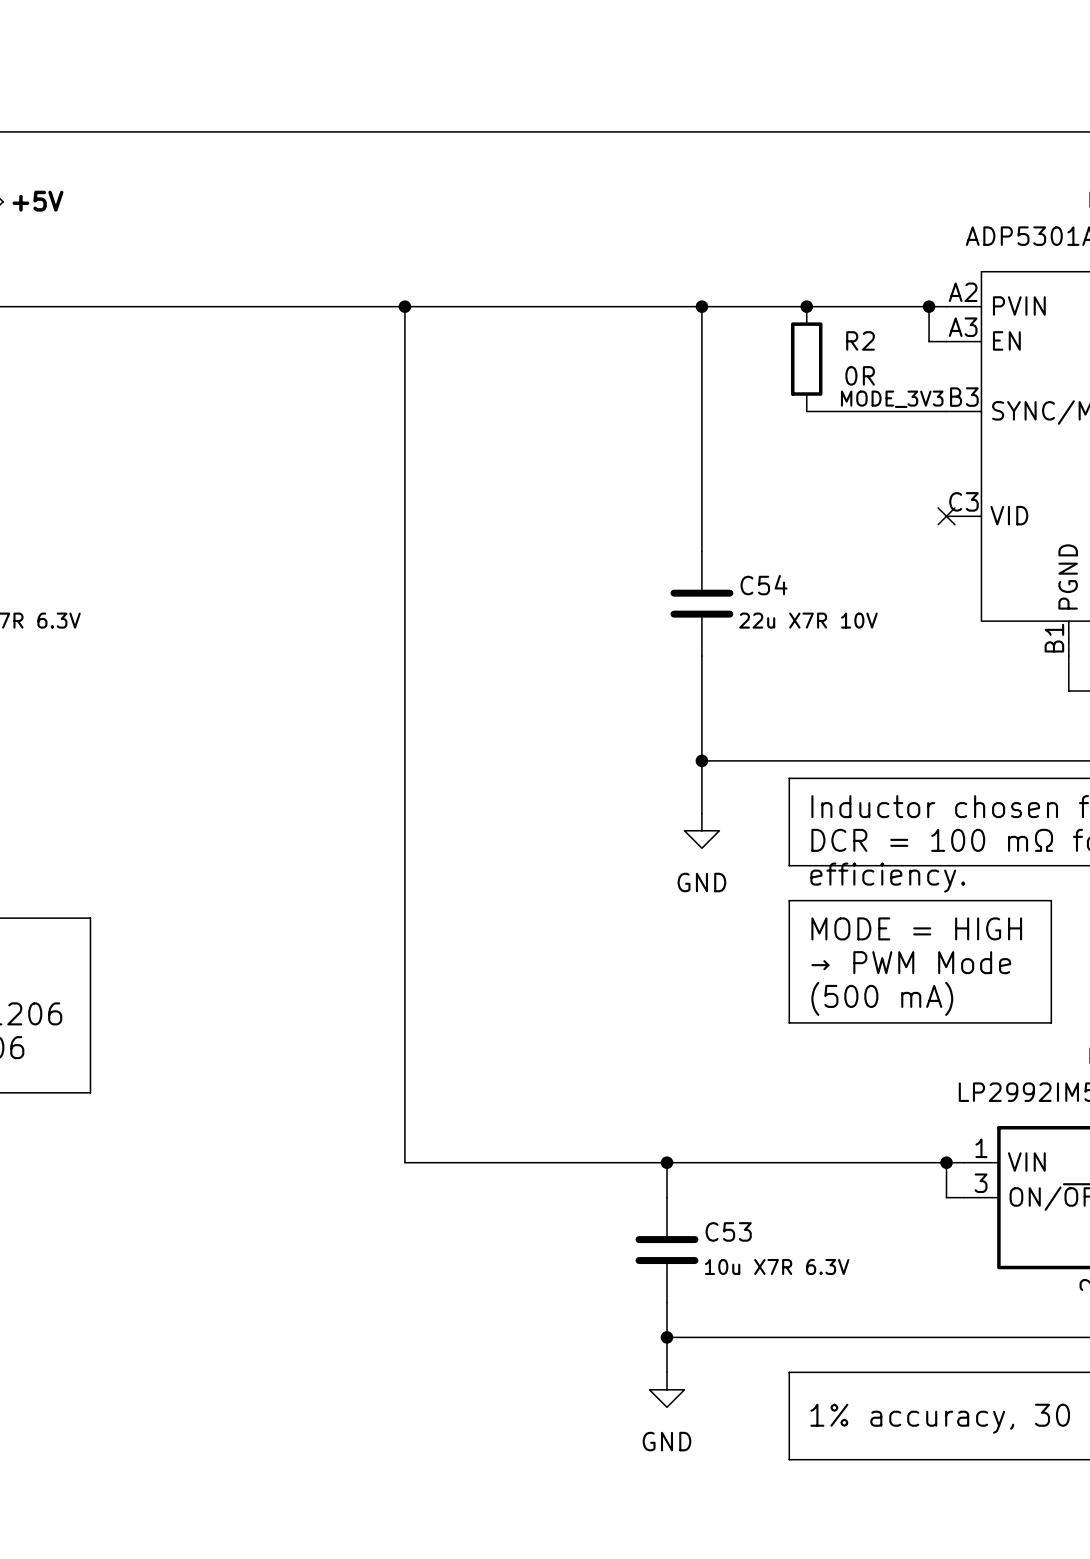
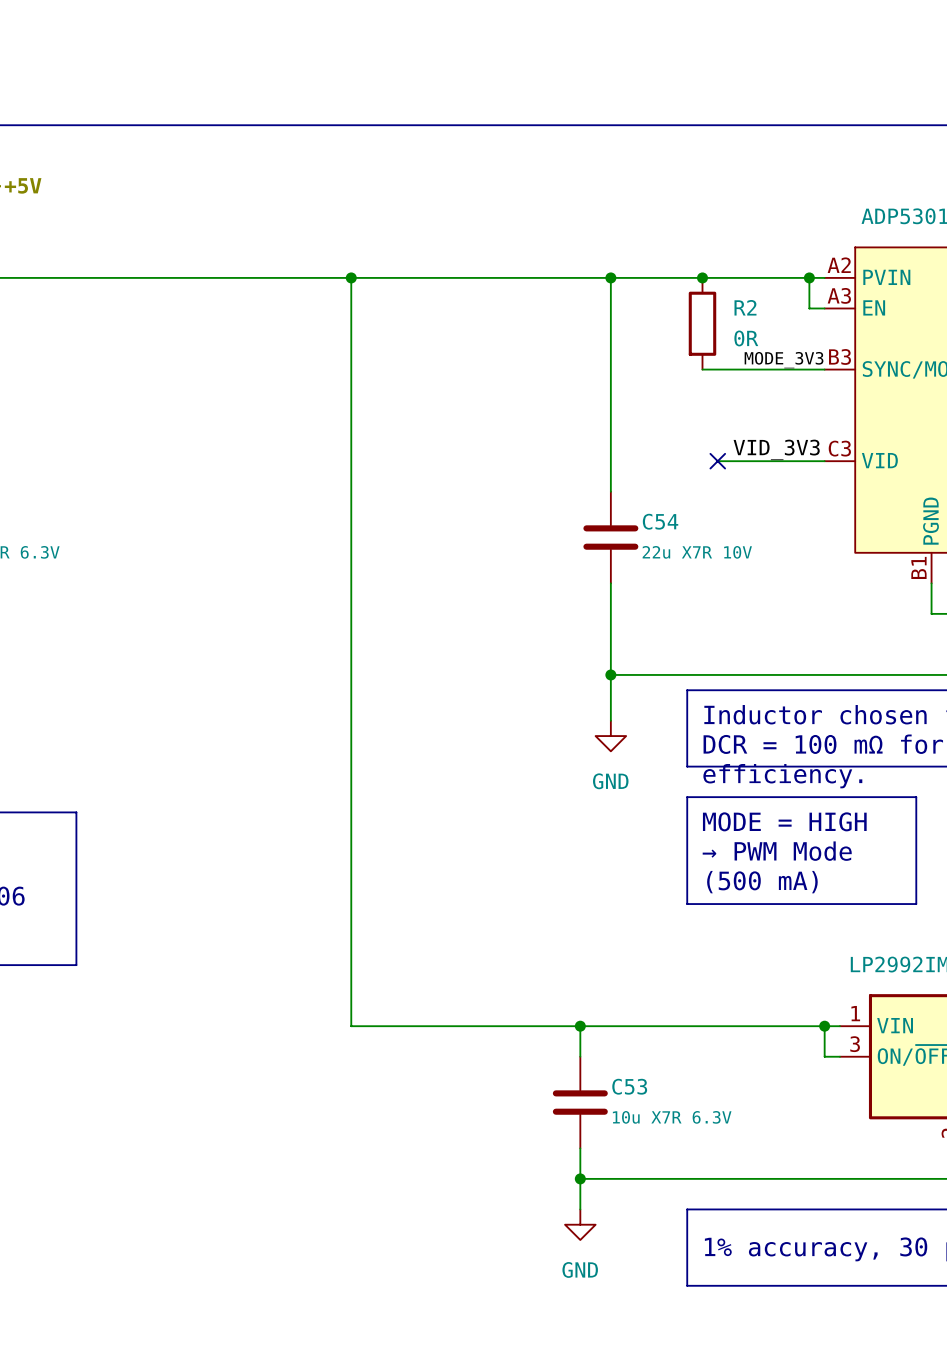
label: none -> VID_3V3 (776, 449)
wire: none -> (717, 461) (824, 461)
no-connect mark: none -> (717, 461)
no-connect mark: (946, 516) -> none

